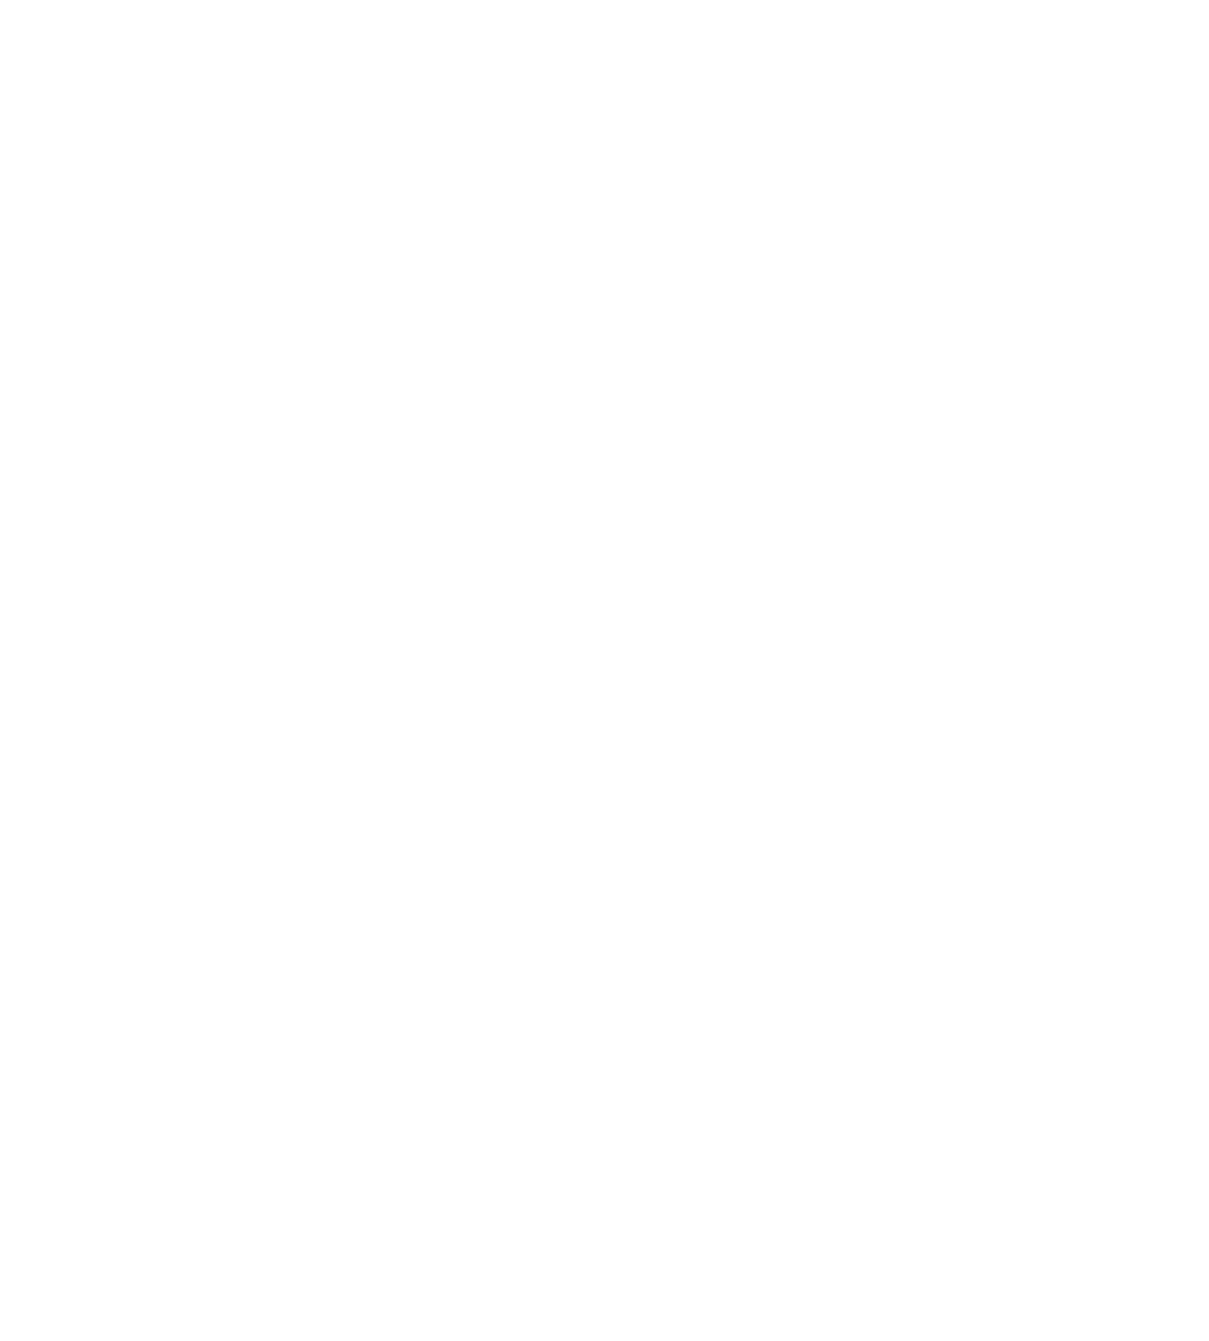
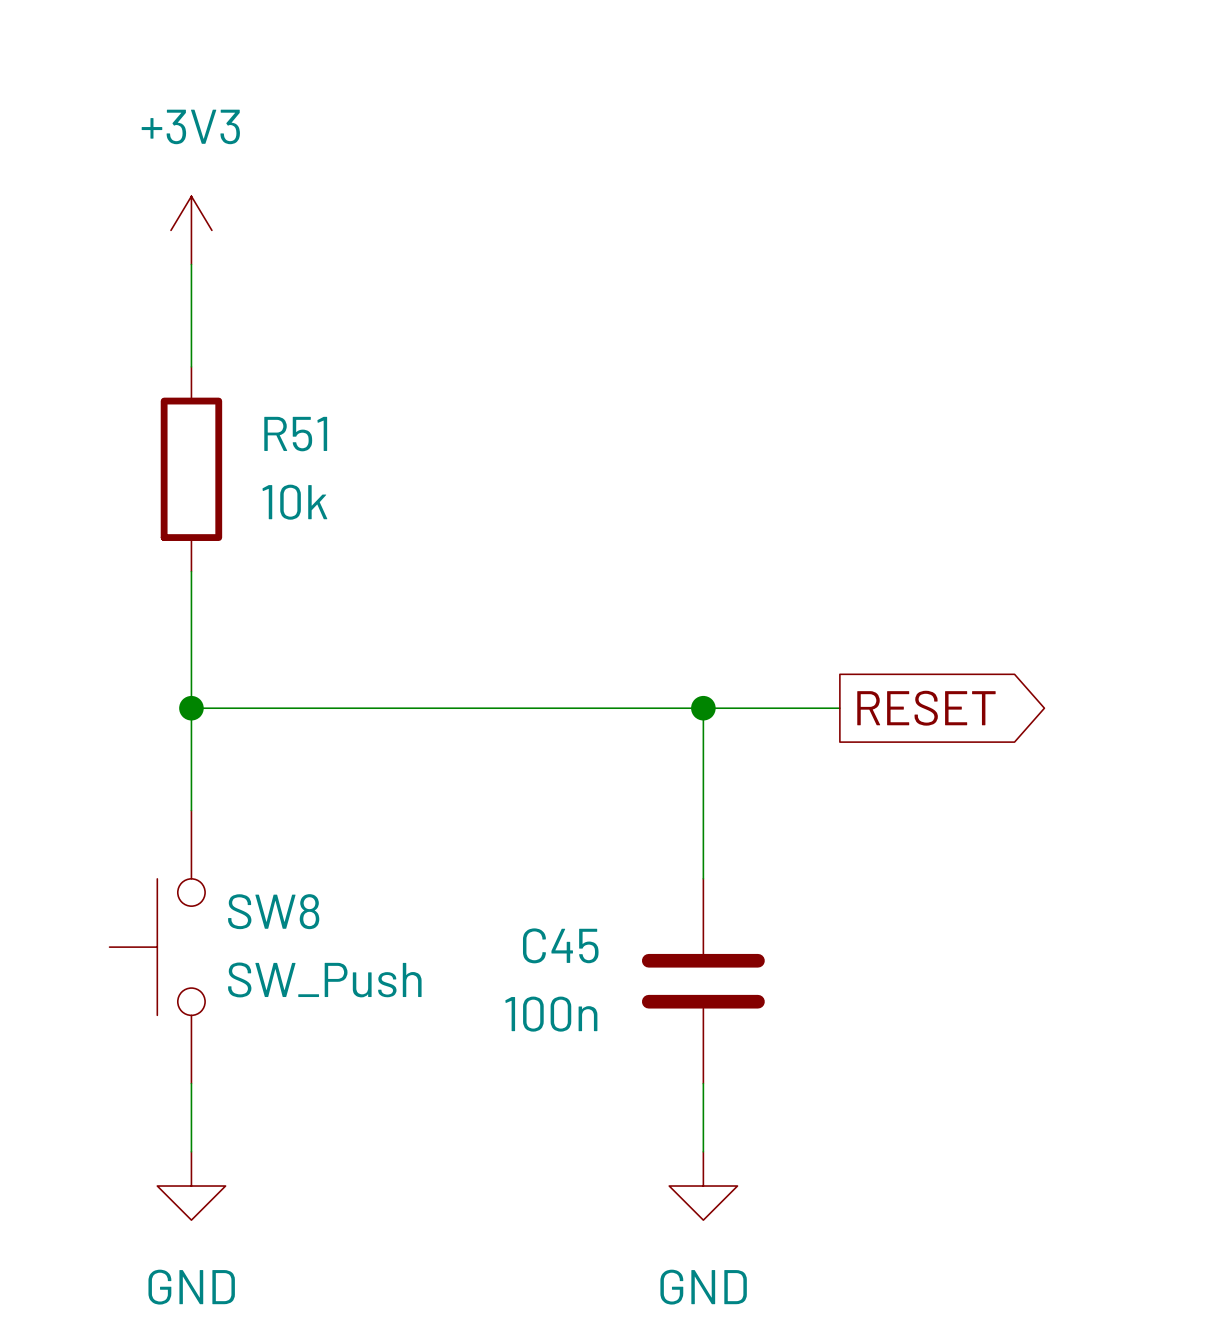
power symbol: none -> +3V3 (191, 230)
wire: none -> (191, 264) (191, 366)
R51: none -> 10k (191, 469)
wire: none -> (191, 571) (191, 810)
wire: none -> (191, 708) (839, 708)
junction: none -> (191, 708)
wire: none -> (703, 708) (703, 878)
junction: none -> (703, 708)
global label: none -> RESET (926, 708)
SW8: none -> SW_Push (157, 947)
C45: none -> 100n (703, 981)
wire: none -> (191, 1083) (191, 1151)
wire: none -> (703, 1083) (703, 1151)
power symbol: none -> GND (191, 1186)
power symbol: none -> GND (703, 1186)

